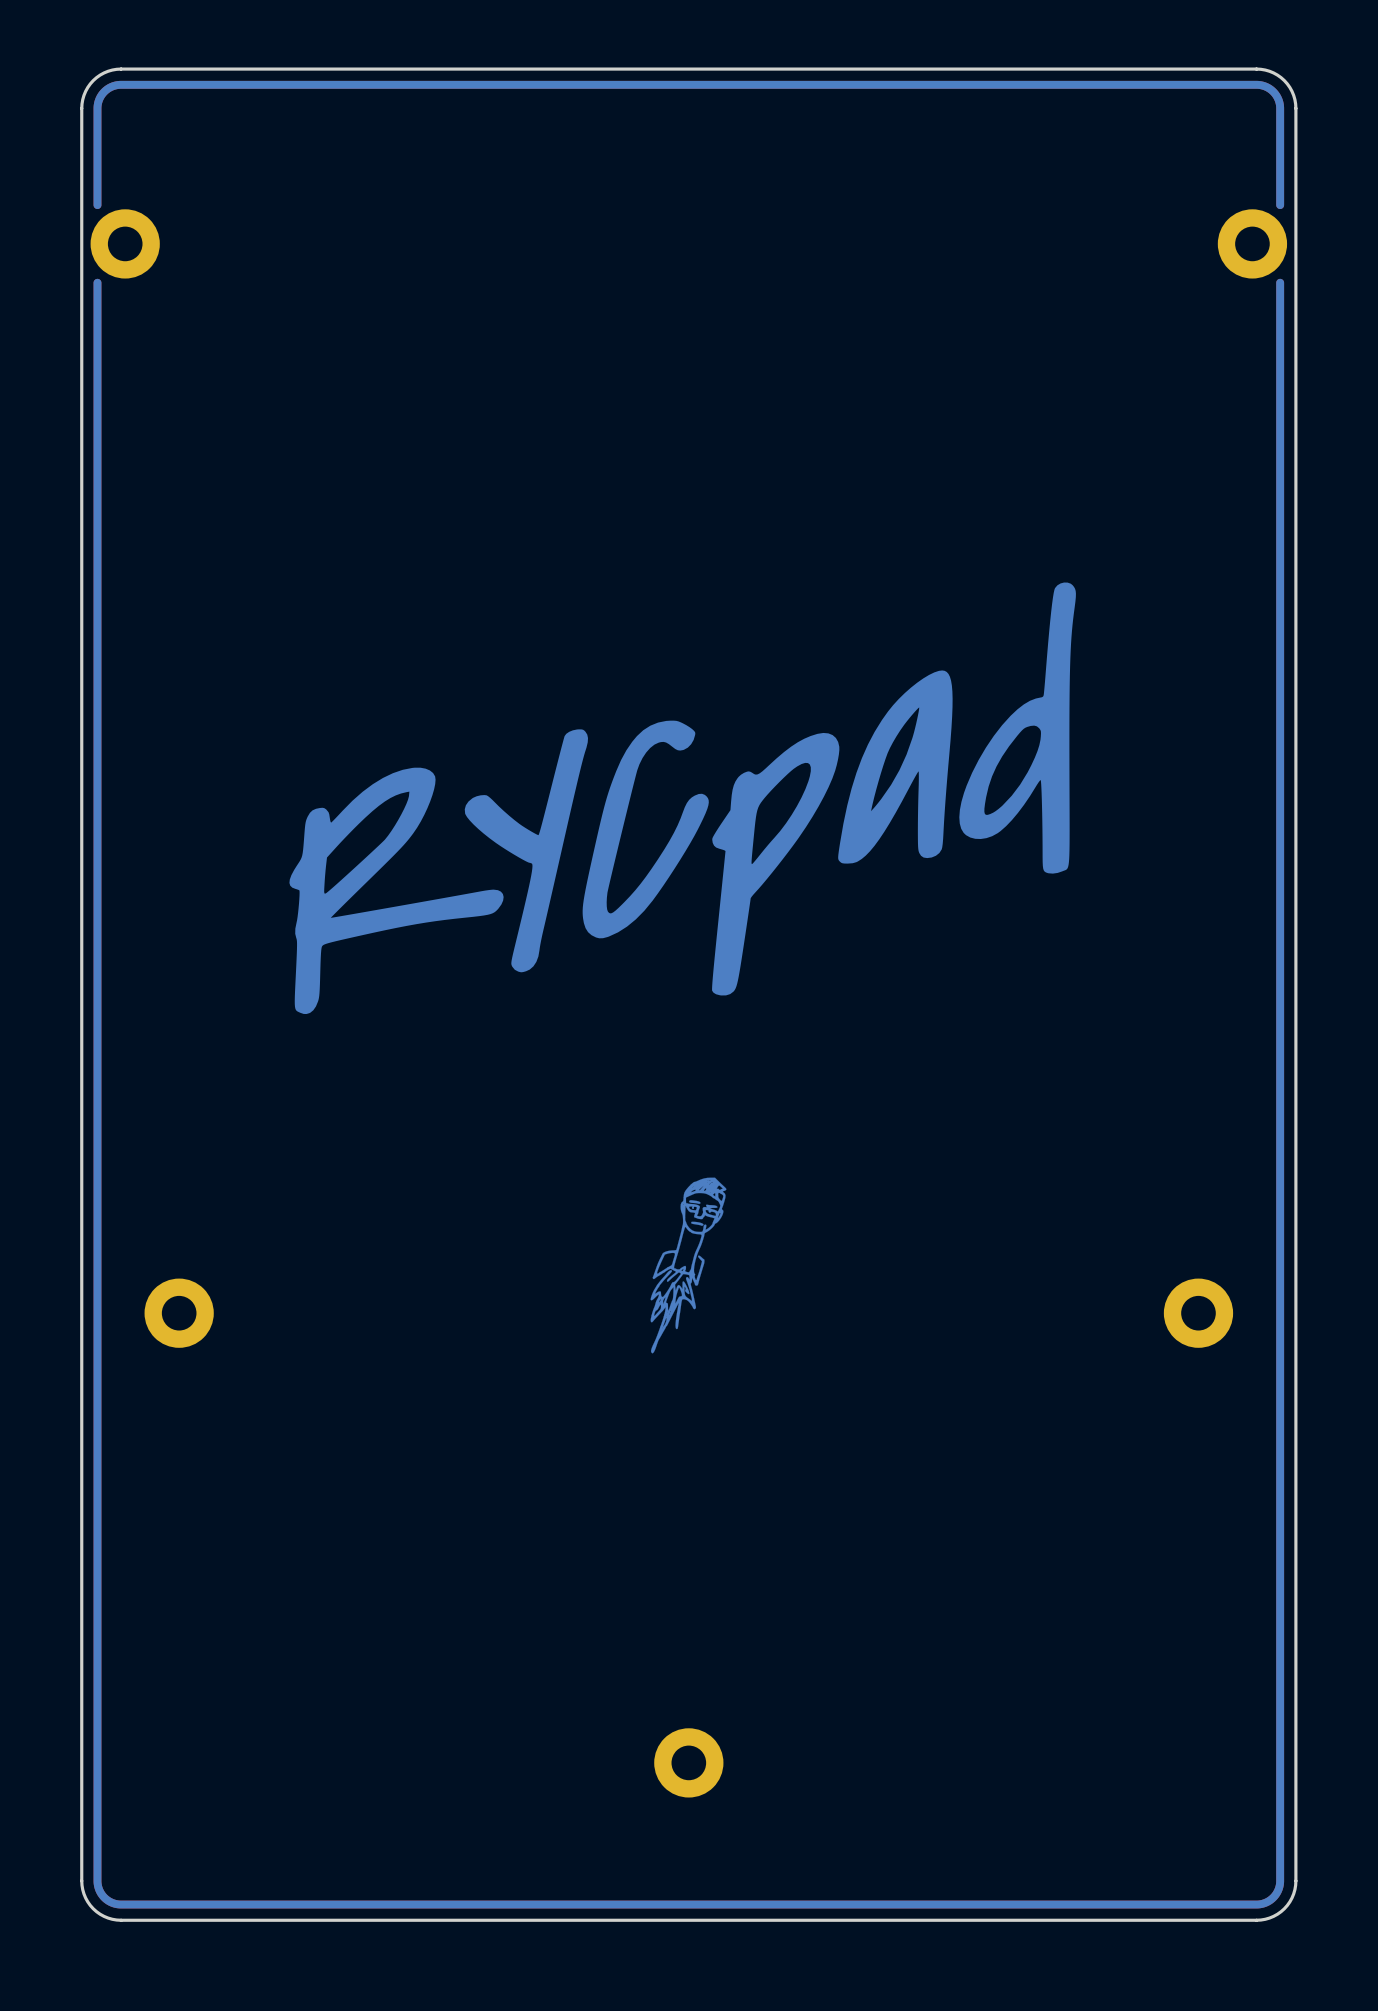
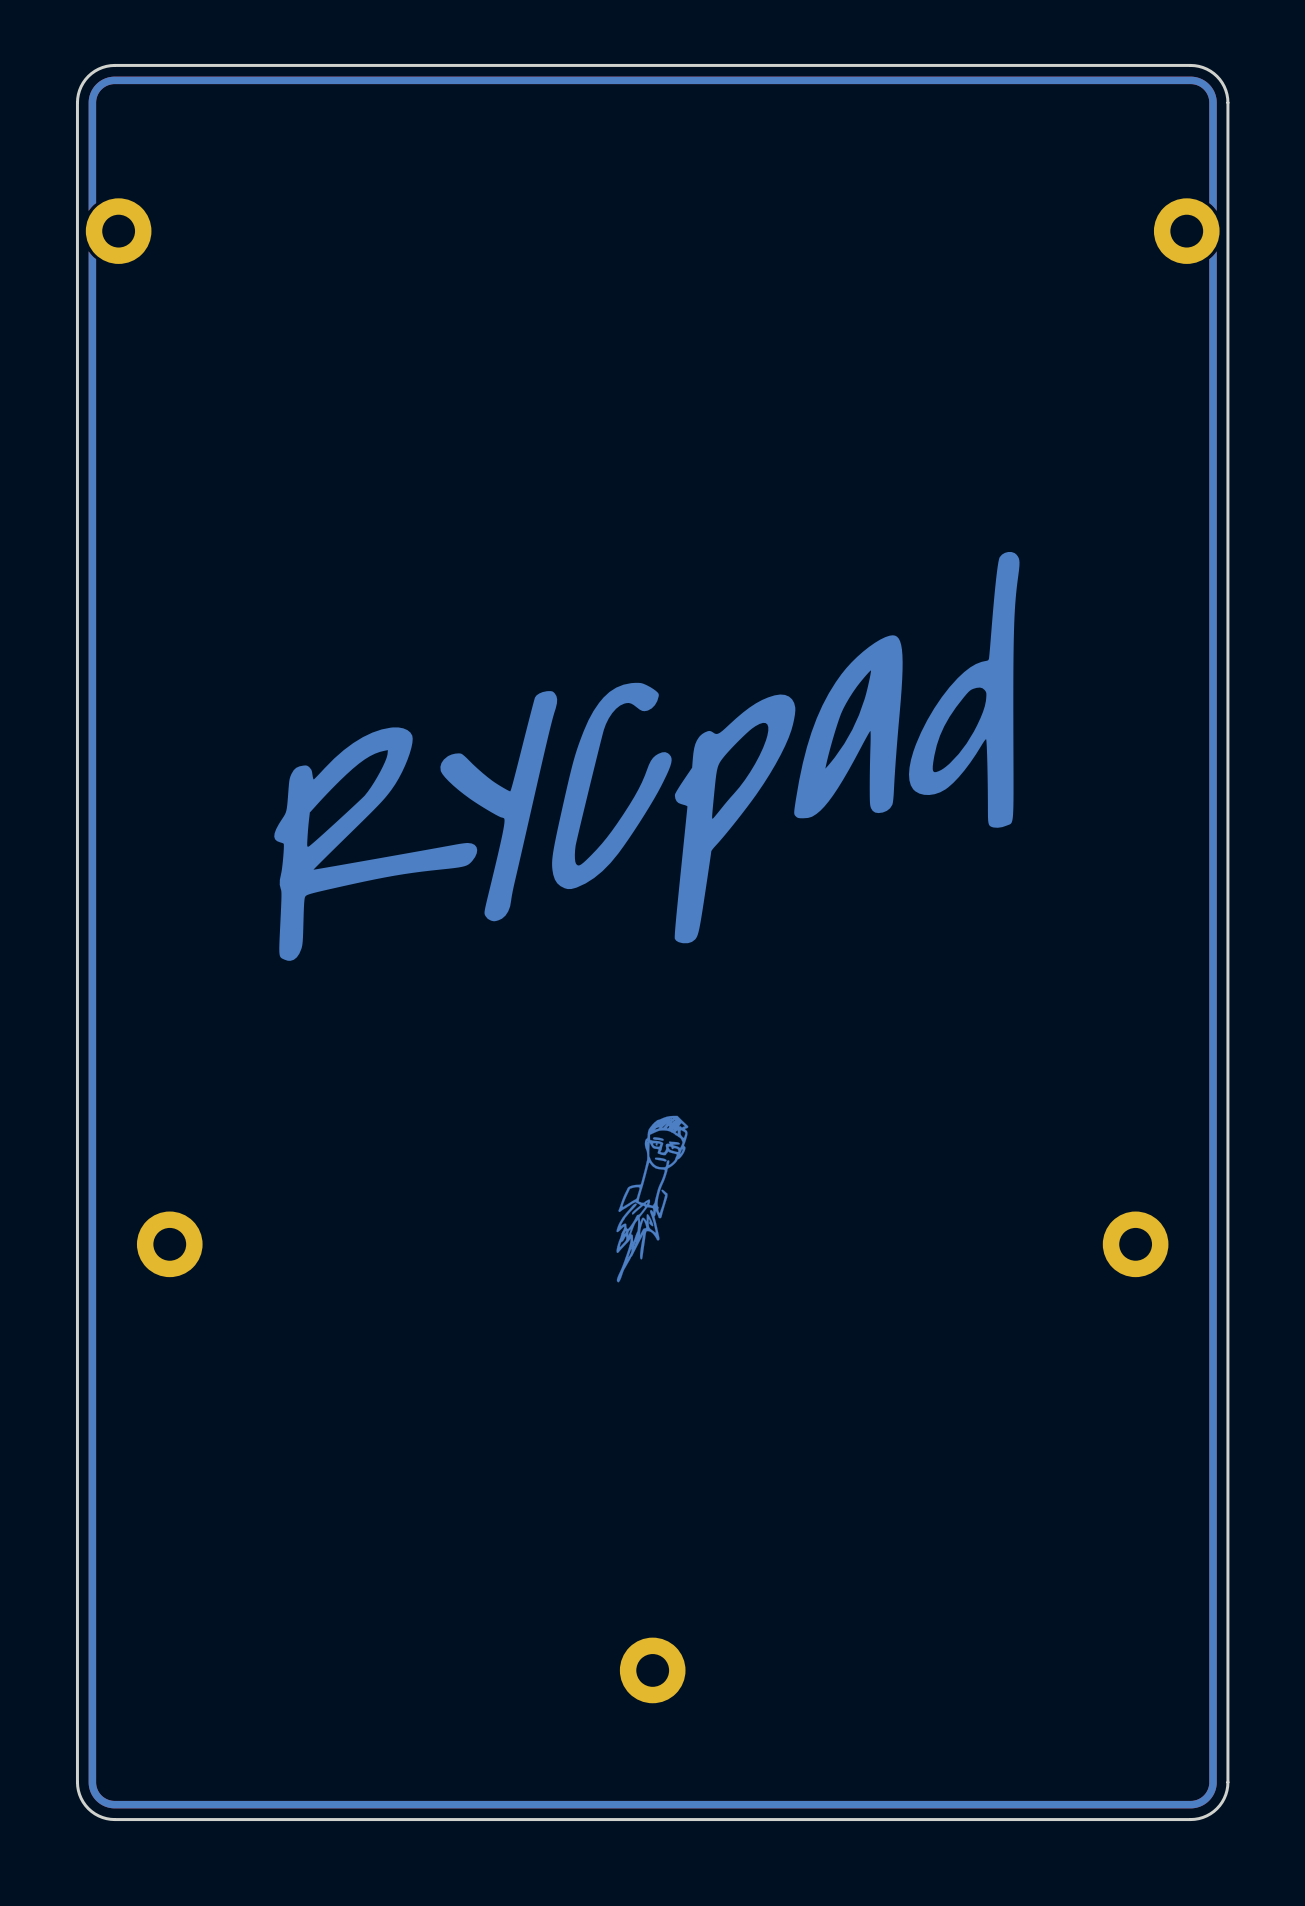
drawing: [93, 80, 1285, 1909] -> none
drawing: none -> [88, 76, 1217, 1809]

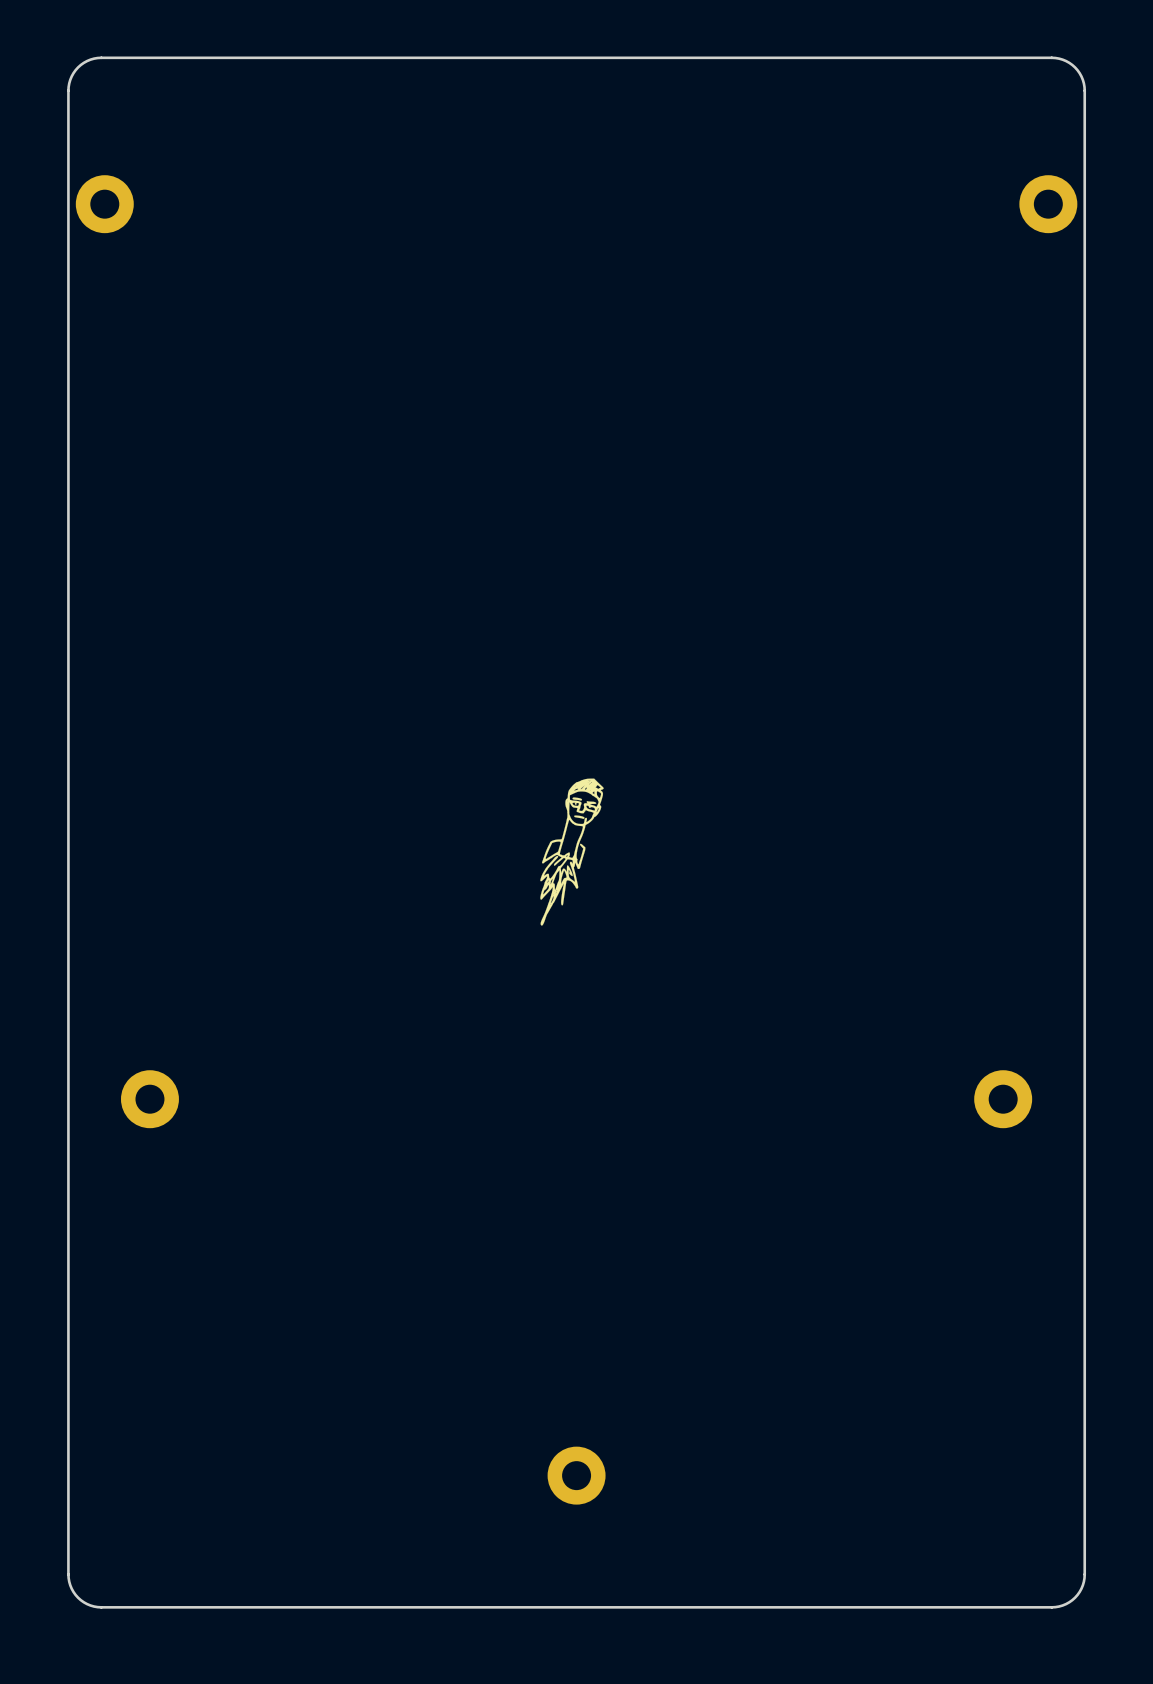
drawing: [88, 76, 1217, 1809] -> none
drawing: none -> [540, 778, 604, 926]

